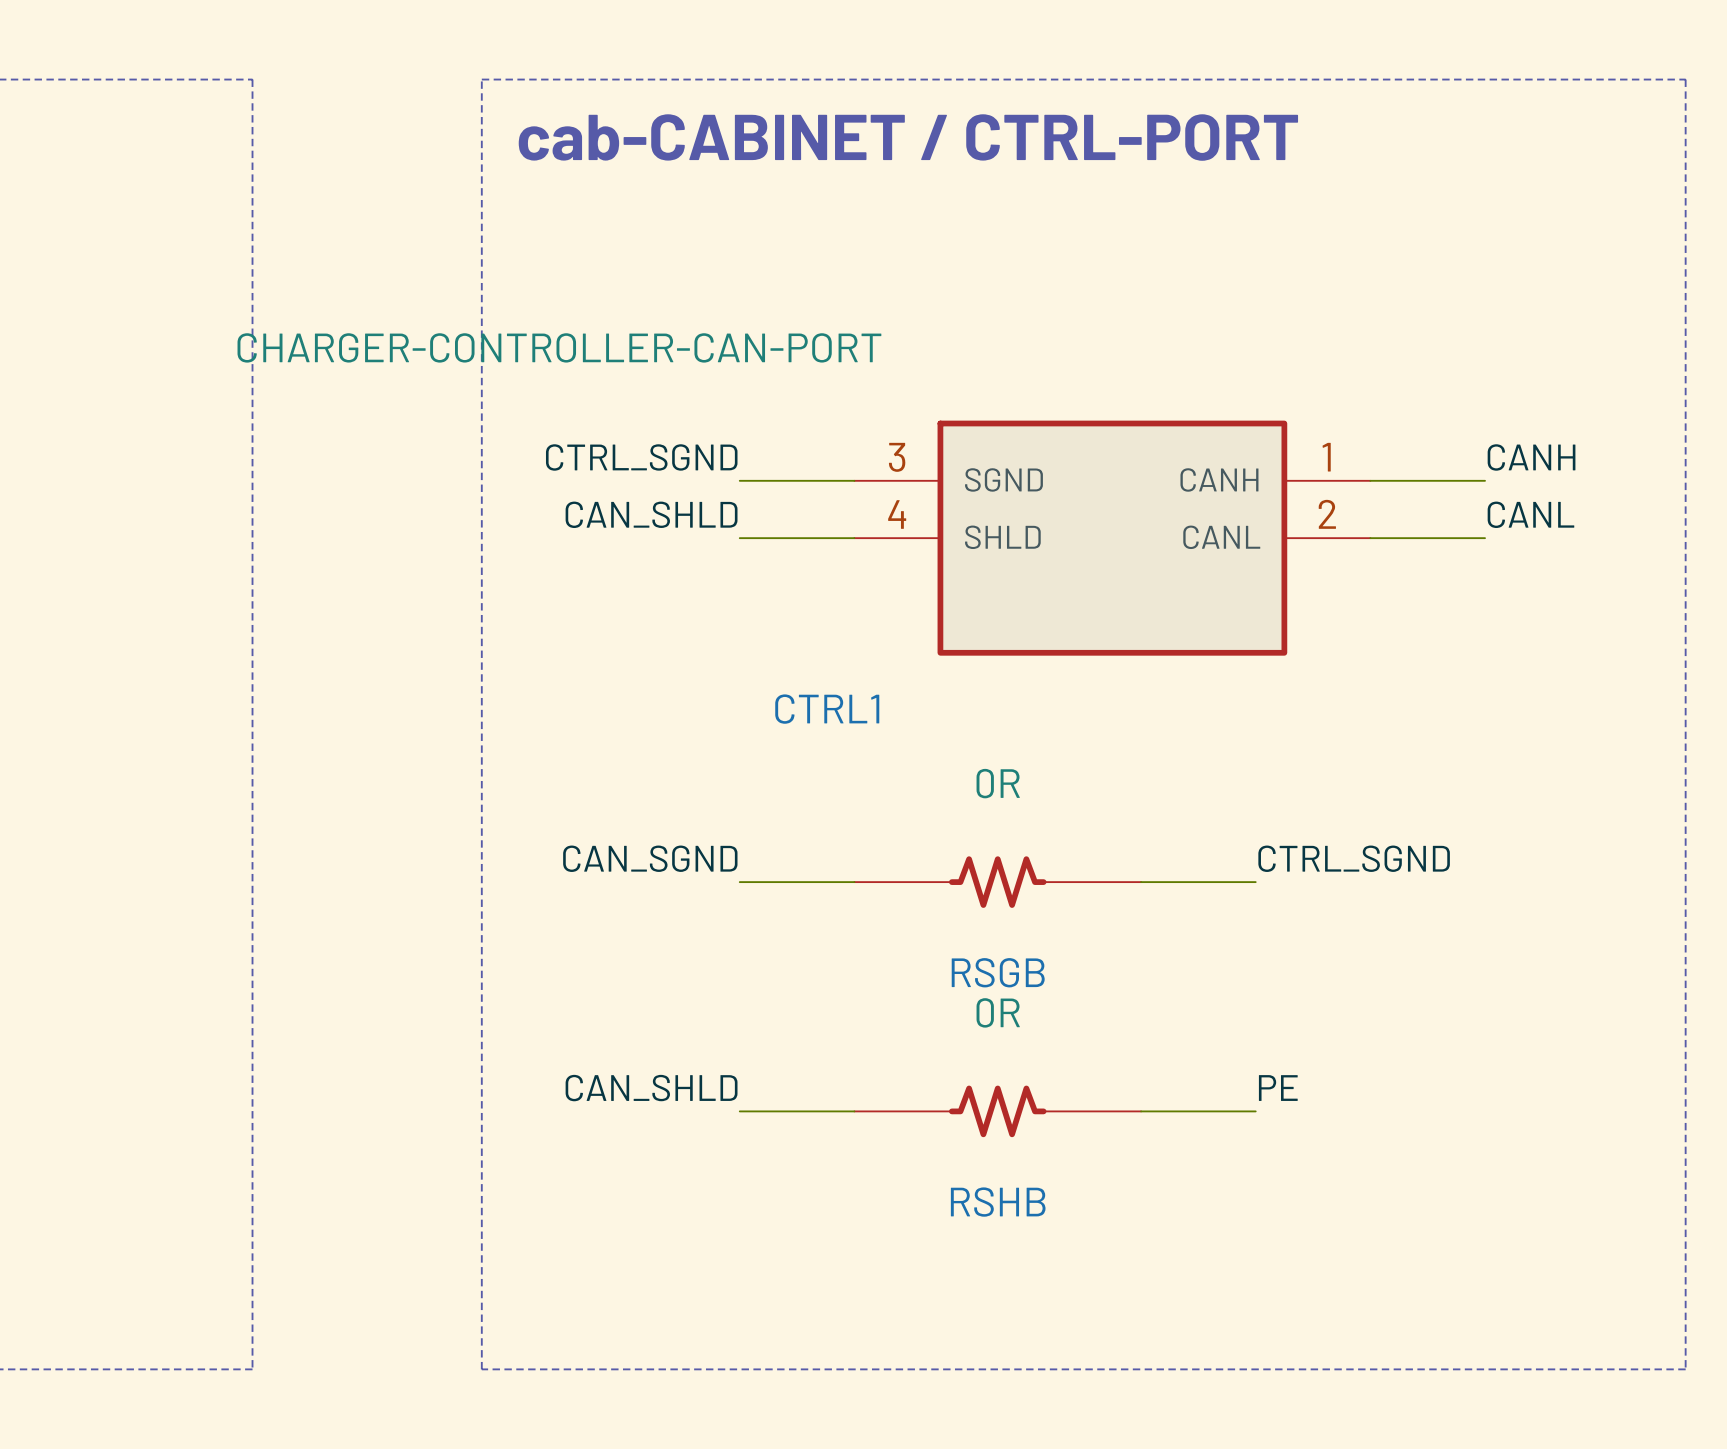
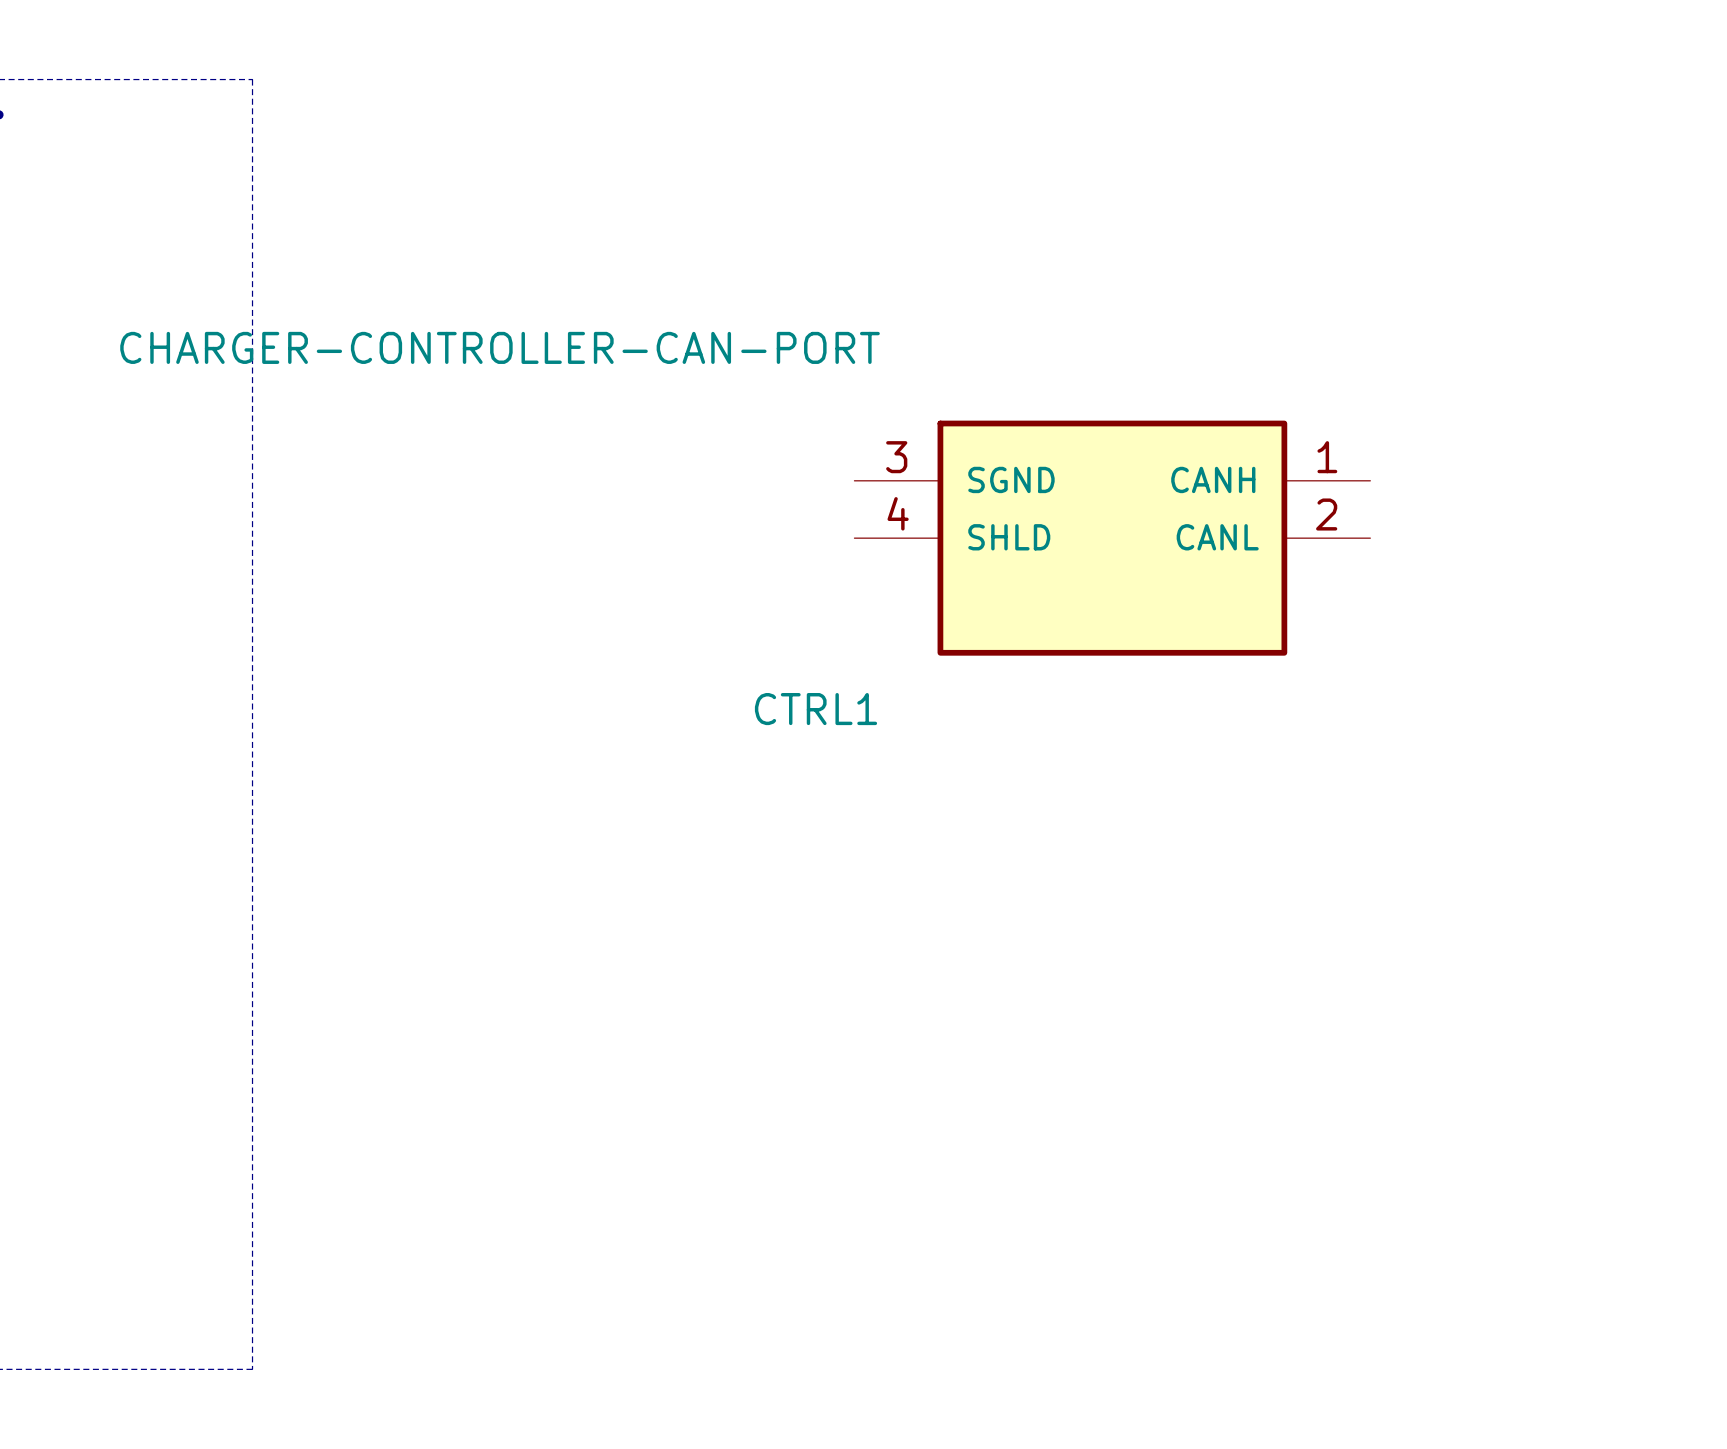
line: (481, 79) (1685, 79) (1685, 1369) (481, 1369) (481, 79) -> none
text: cab-CABINET / CTRL-PORT (908, 137) -> none
label: CTRL_SGND (641, 457) -> none
label: CANH (1531, 457) -> none
wire: (739, 480) (854, 480) -> none
wire: (1370, 480) (1485, 480) -> none
label: CAN_SHLD (651, 514) -> none
label: CANL (1530, 514) -> none
wire: (739, 538) (854, 538) -> none
wire: (1370, 538) (1485, 538) -> none
label: CAN_SGND (650, 858) -> none
label: CTRL_SGND (1354, 858) -> none
wire: (739, 882) (854, 882) -> none
RSGB: 0R (997, 882) -> none
wire: (1141, 882) (1255, 882) -> none
label: CAN_SHLD (651, 1088) -> none
label: PE (1278, 1088) -> none
wire: (739, 1111) (854, 1111) -> none
RSHB: 0R (997, 1111) -> none
wire: (1141, 1111) (1255, 1111) -> none

